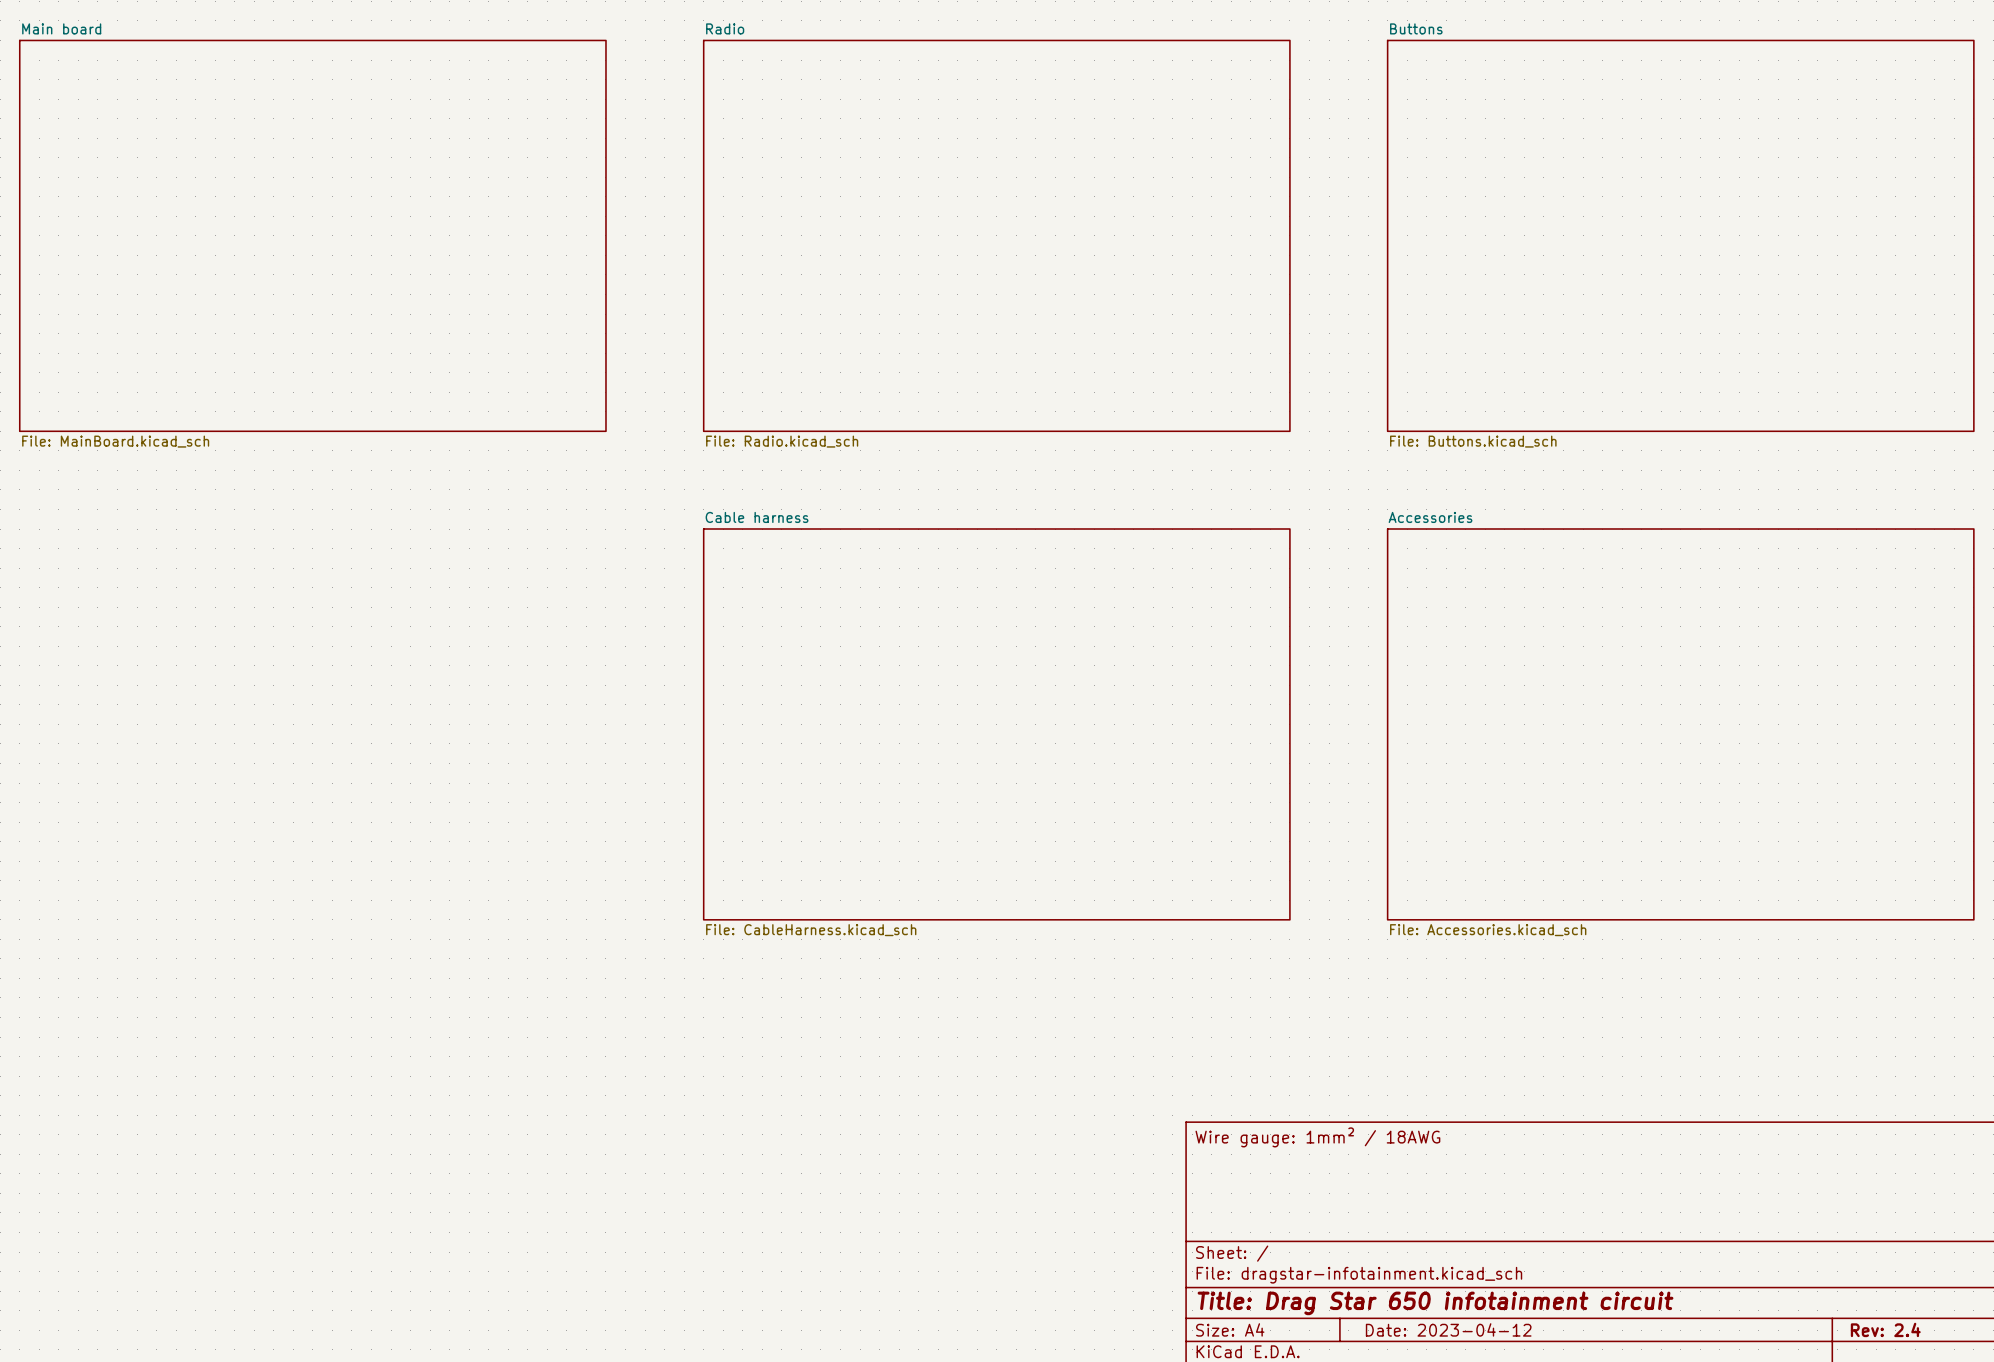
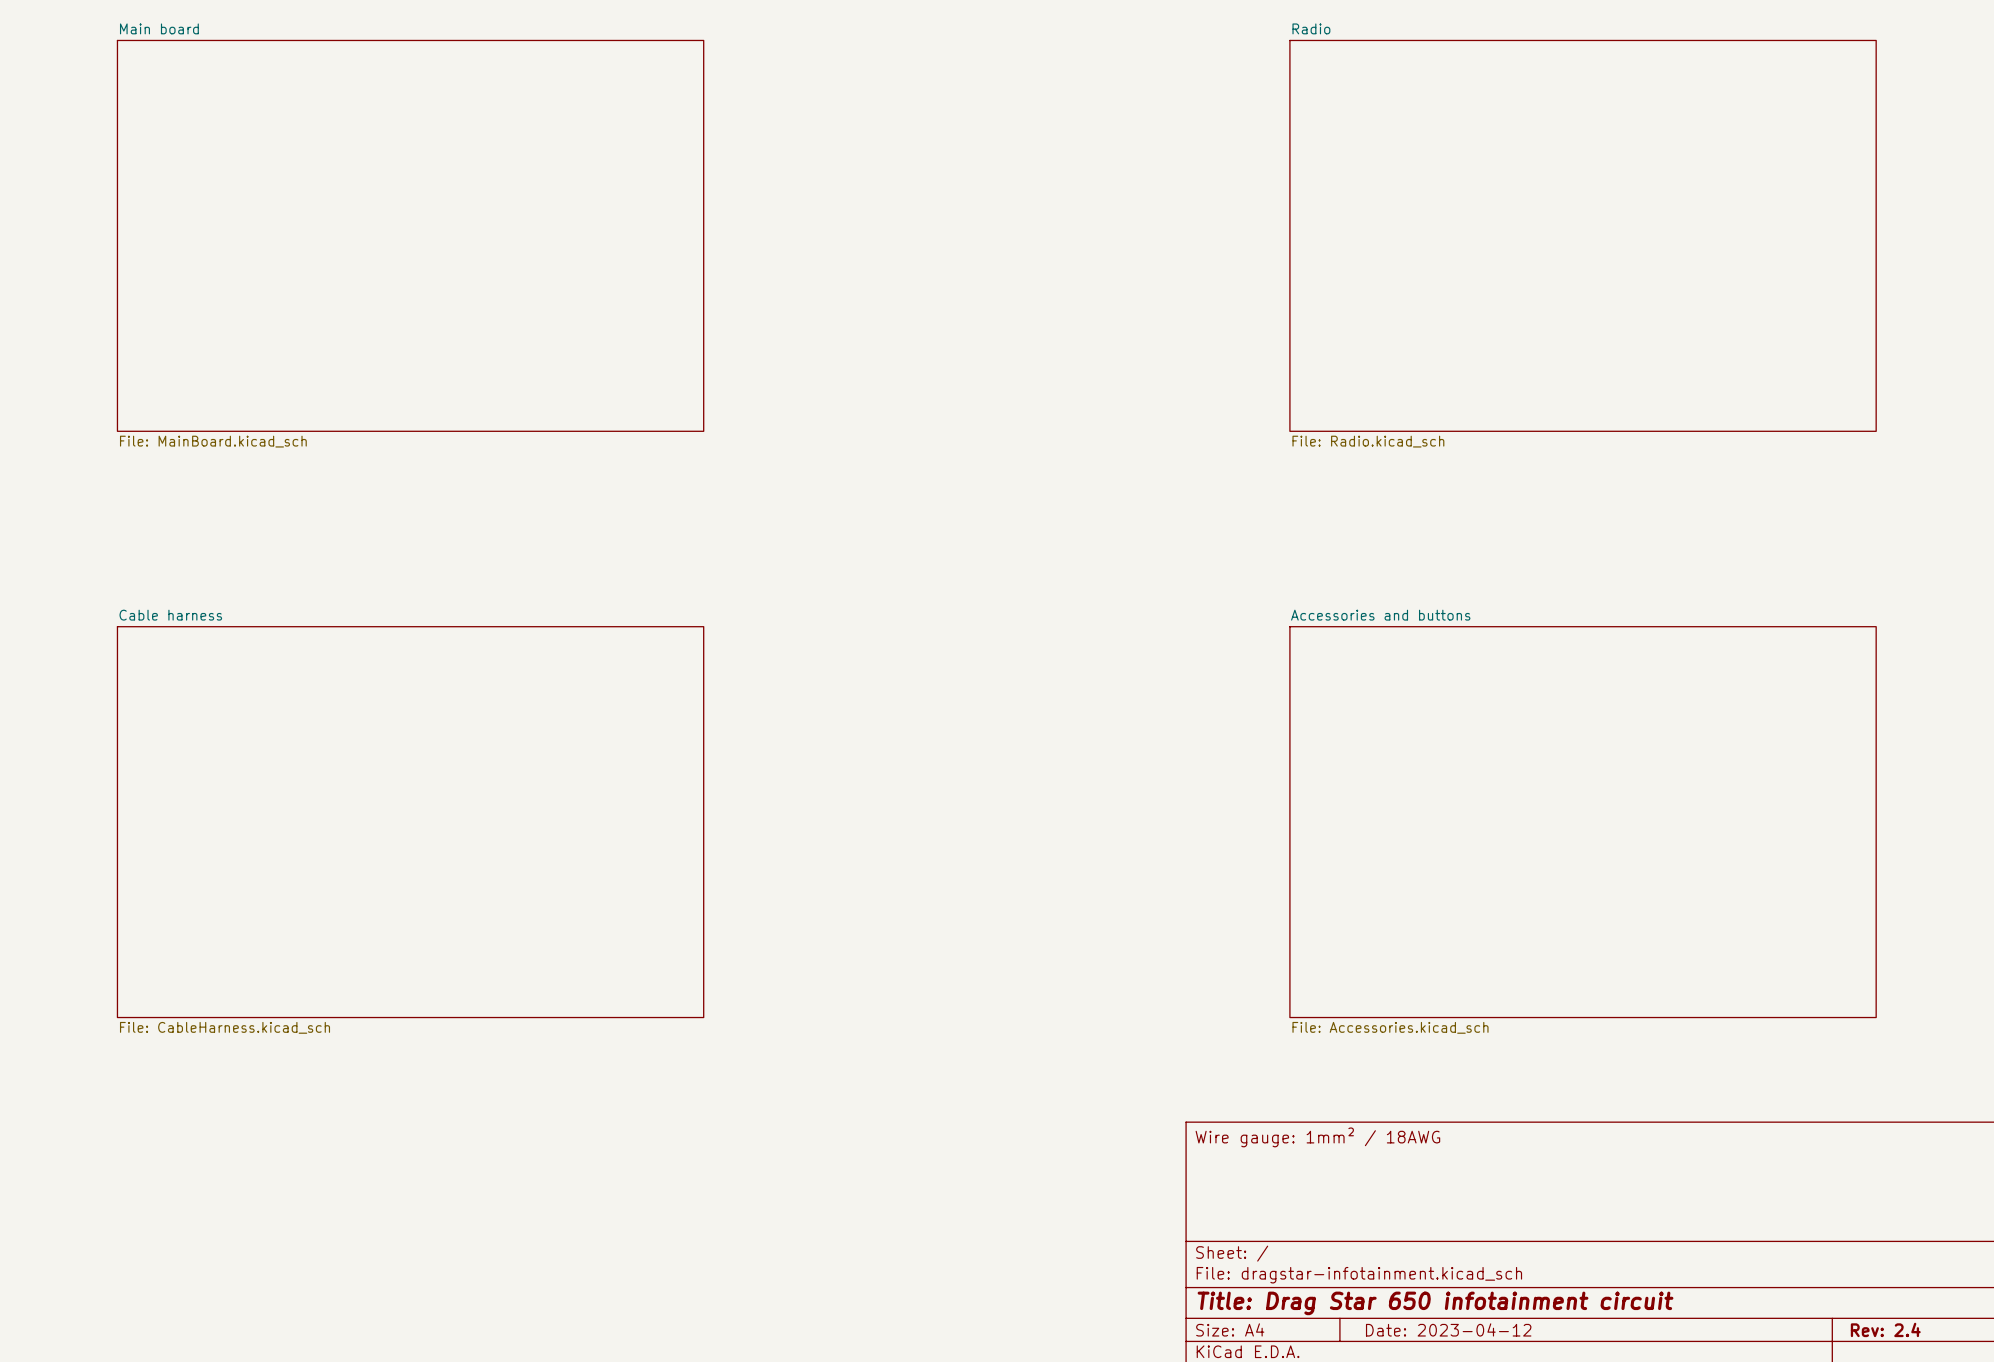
sheet Main board position: (312, 235) -> (410, 235)
sheet Radio: File: Radio.kicad_sch (996, 235) -> none
sheet Radio: none -> File: Radio.kicad_sch (1583, 235)
sheet Buttons: File: Buttons.kicad_sch (1680, 235) -> none
sheet Cable harness: File: CableHarness.kicad_sch (996, 724) -> none
sheet Accessories: File: Accessories.kicad_sch (1680, 724) -> none
sheet Cable harness: none -> File: CableHarness.kicad_sch (410, 822)
sheet Accessories and buttons: none -> File: Accessories.kicad_sch (1583, 822)

